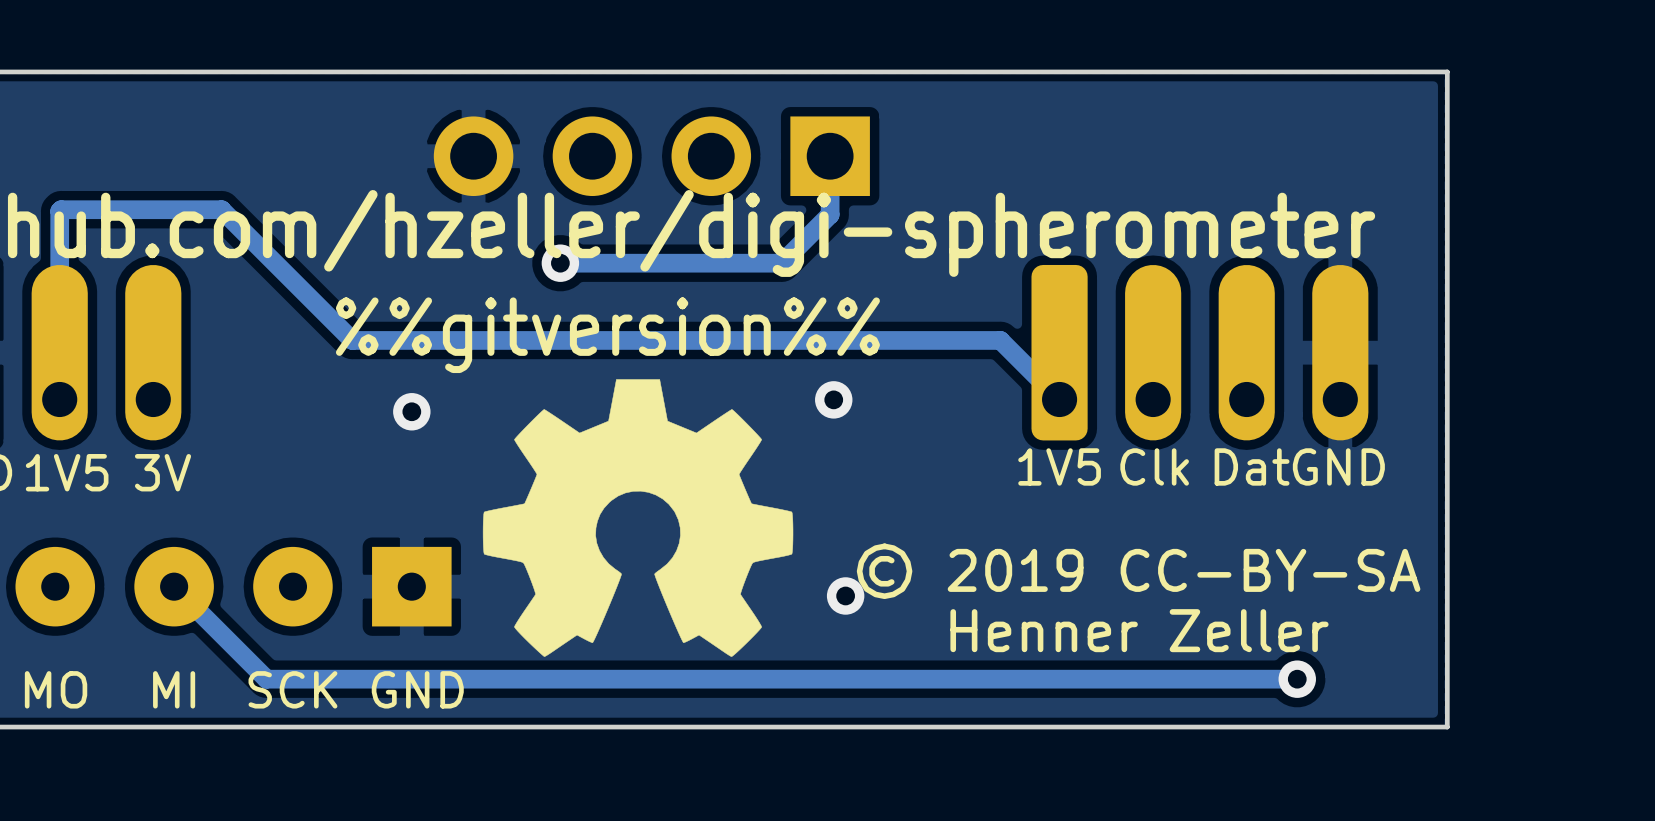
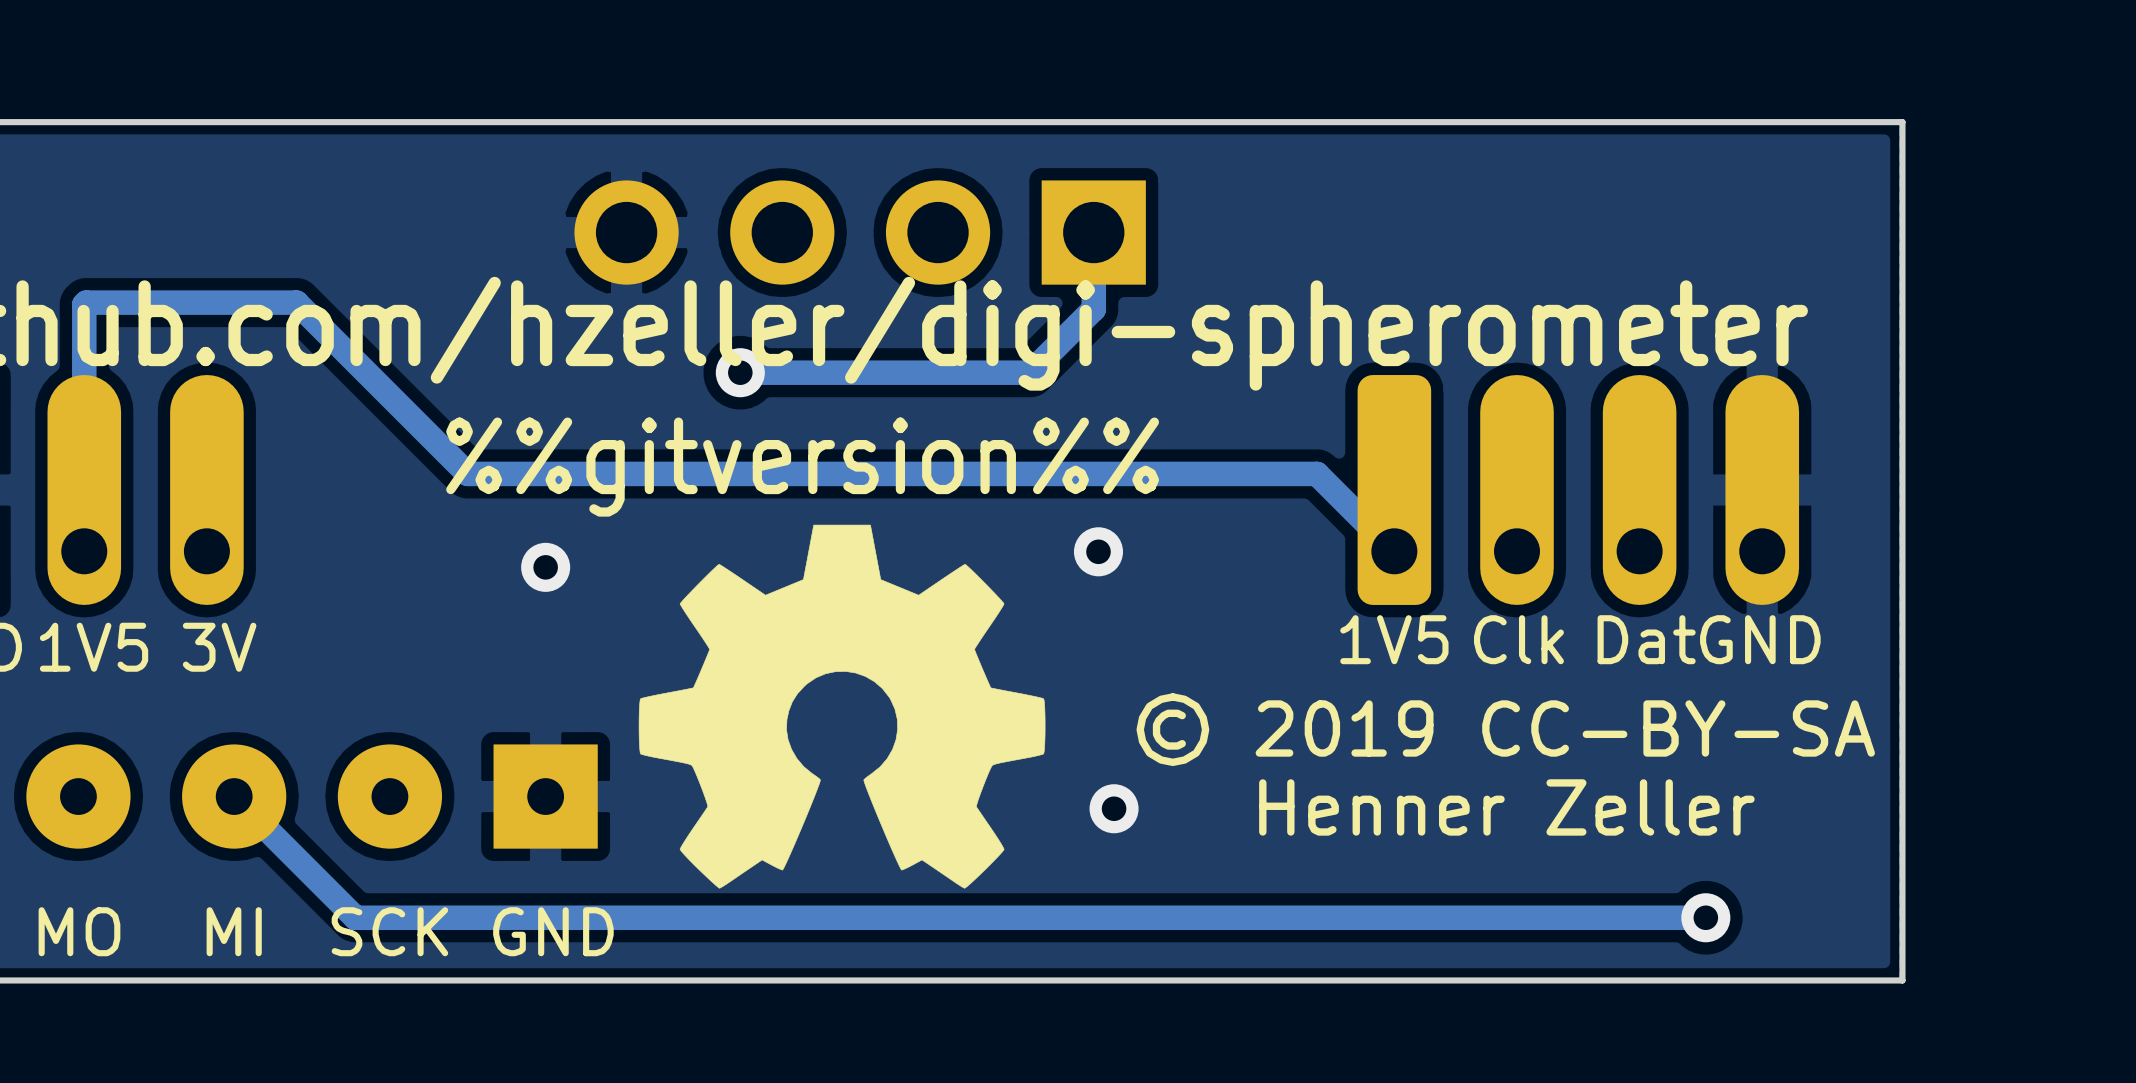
text position: © 2019 CC-BY-SA (1138, 571) -> © 2019 CC-BY-SA (1505, 729)
text position: Henner Zeller (1139, 630) -> Henner Zeller (1506, 807)

